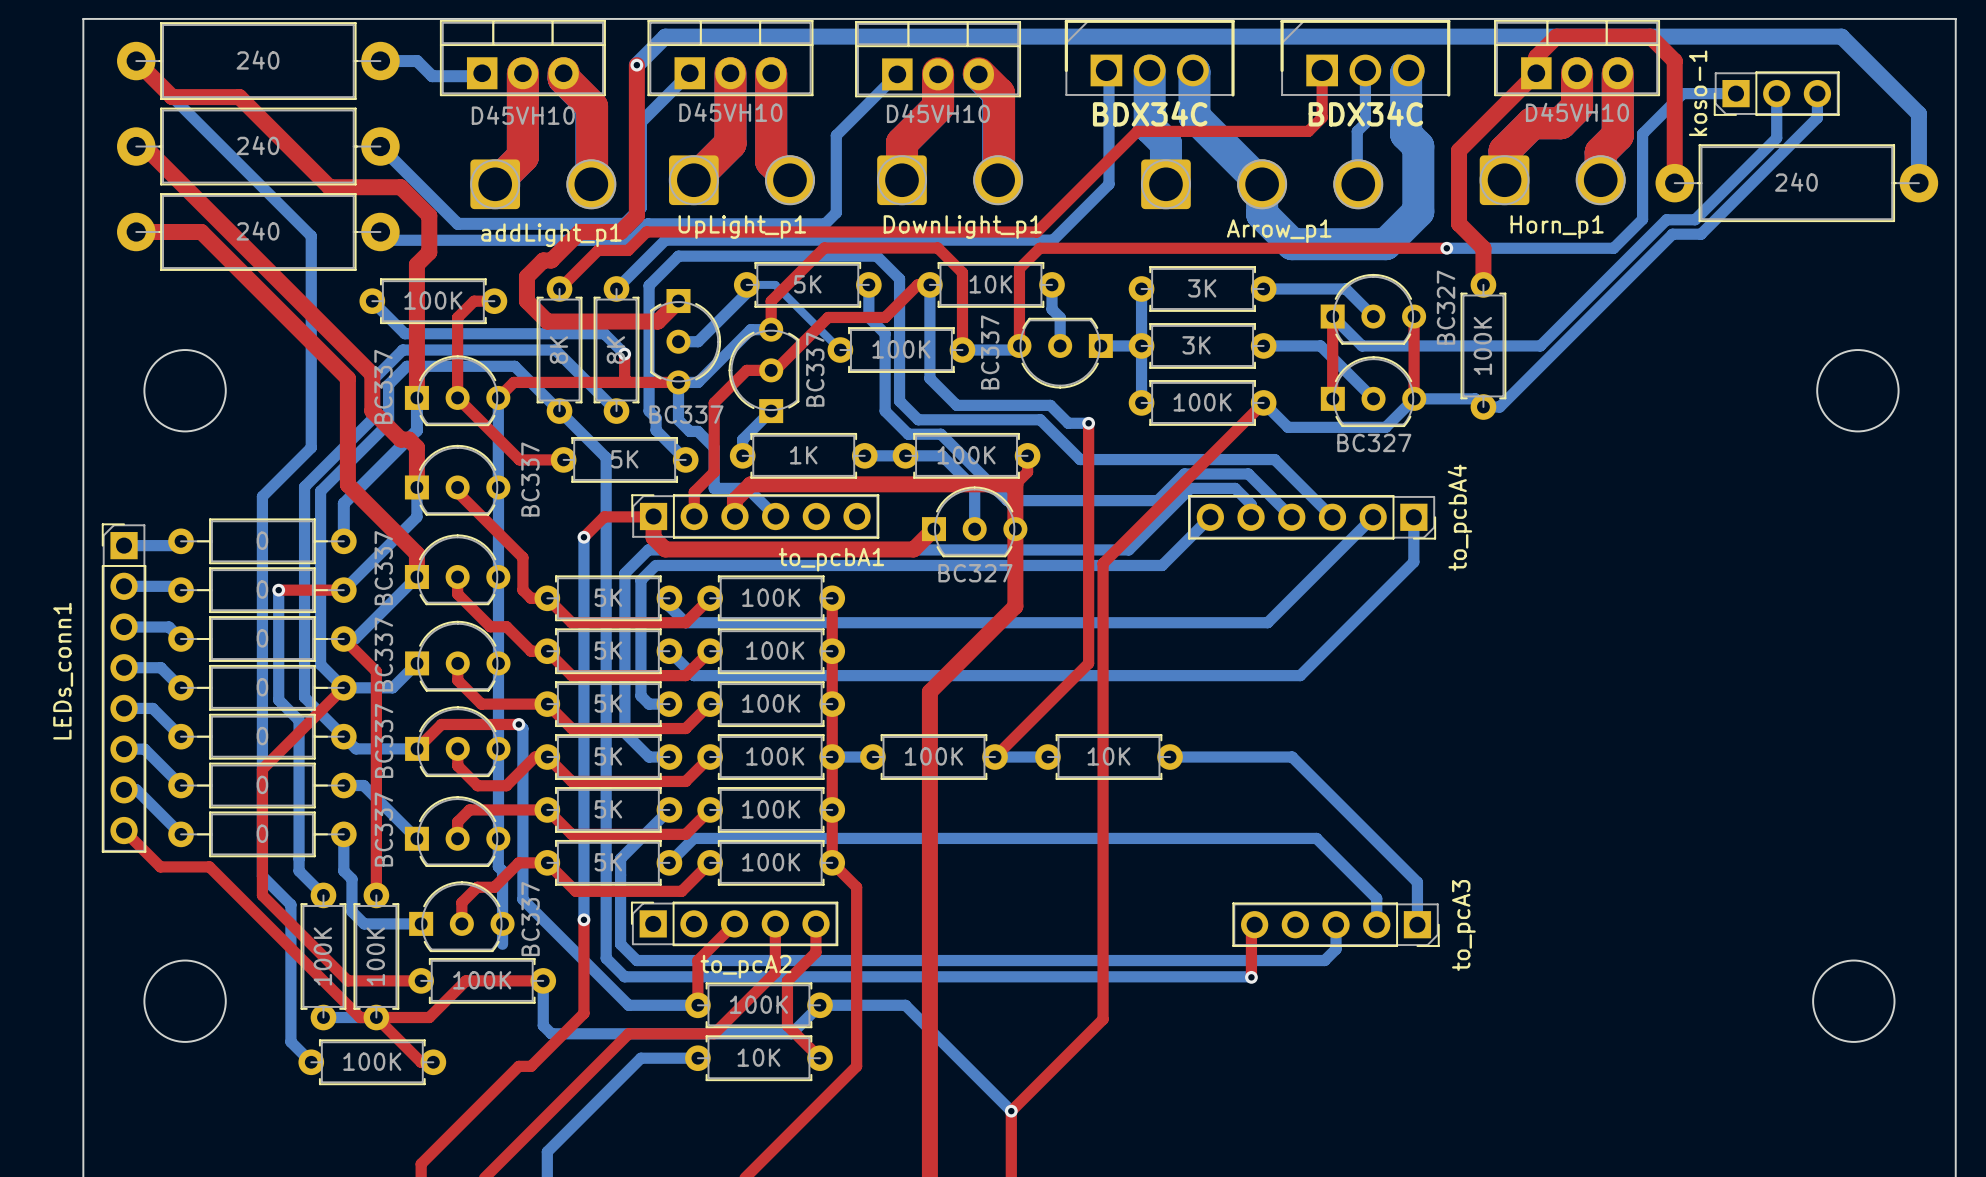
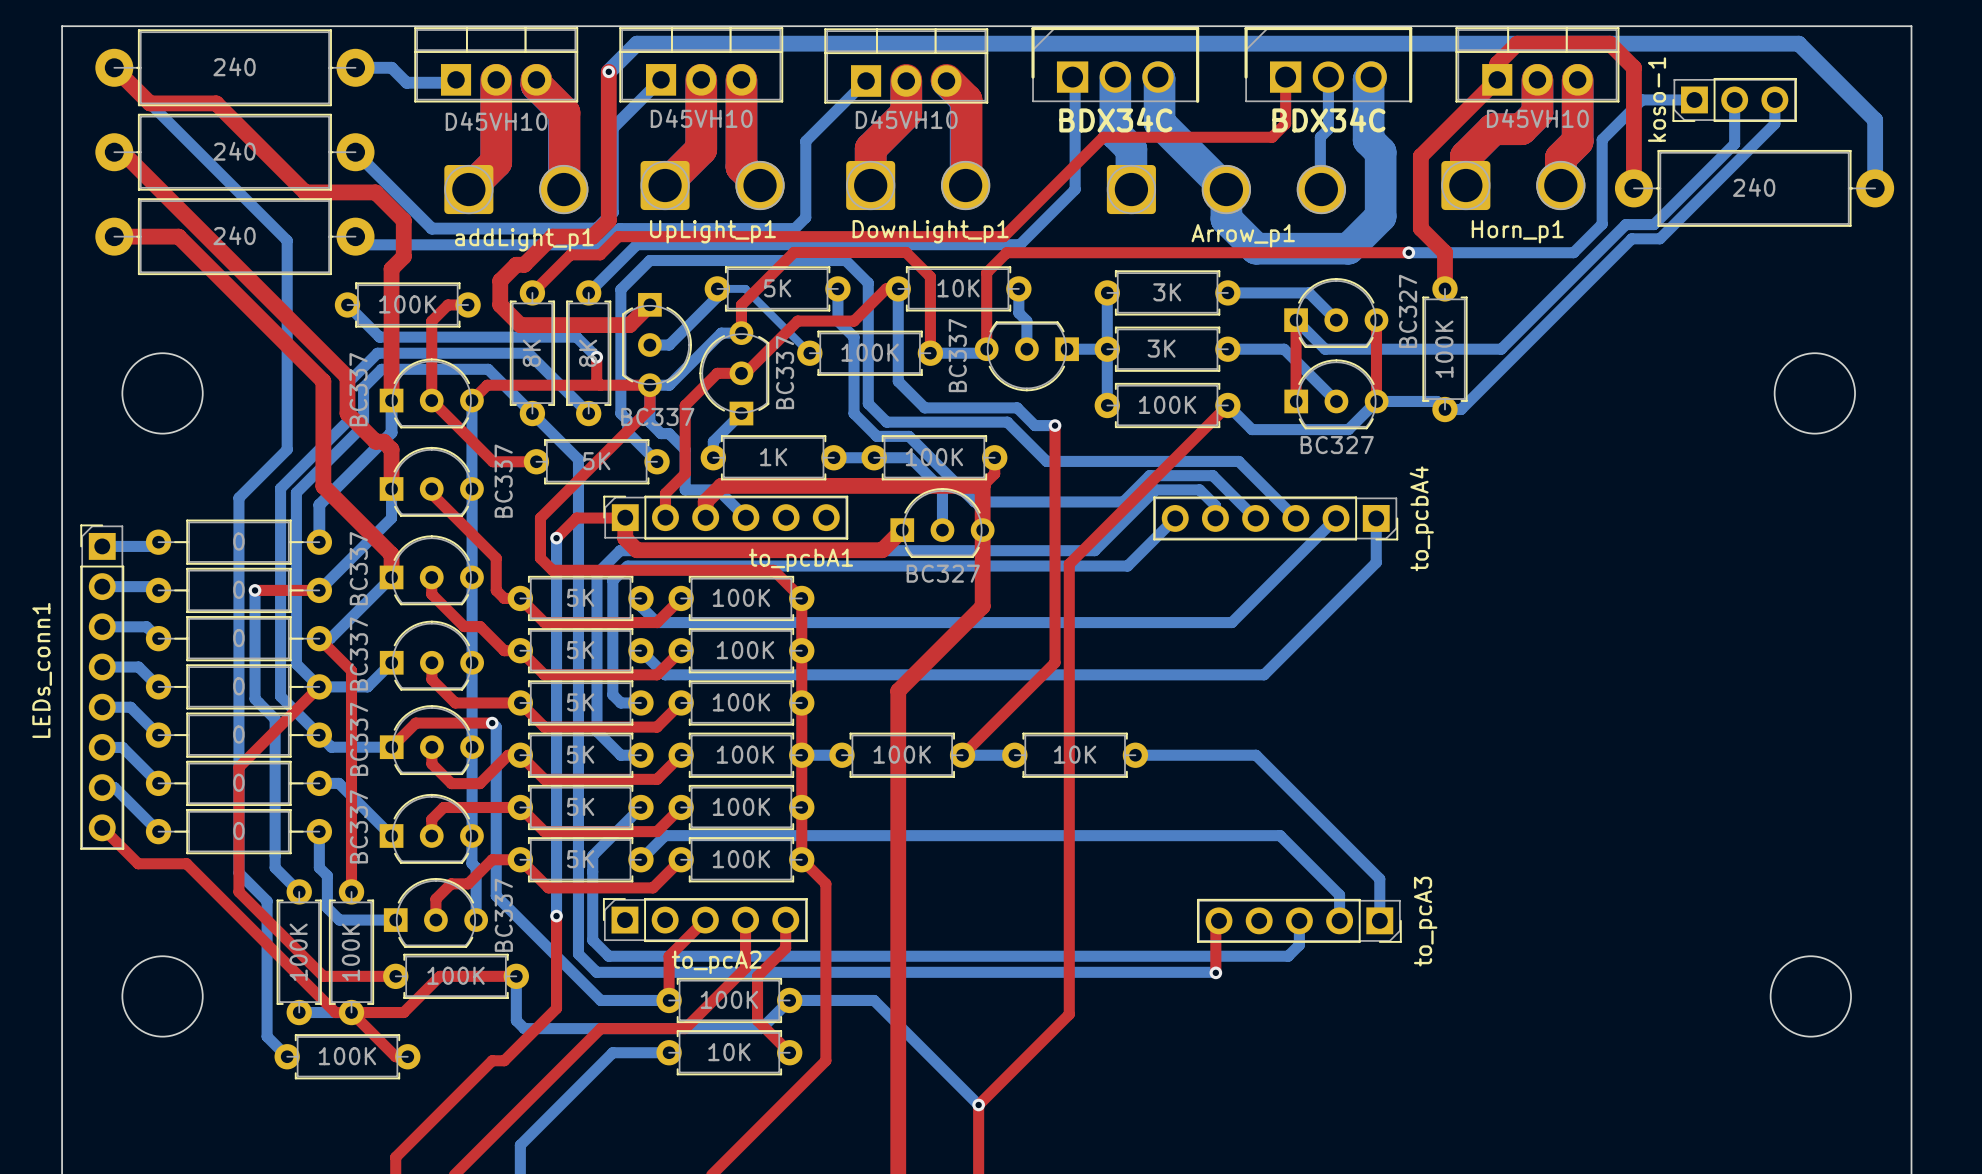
top track: none -> (649, 385) (649, 408) (540, 518) (540, 558) (552, 570) (773, 570) (801, 598)
bottom track: (502, 923) (502, 944) -> none

